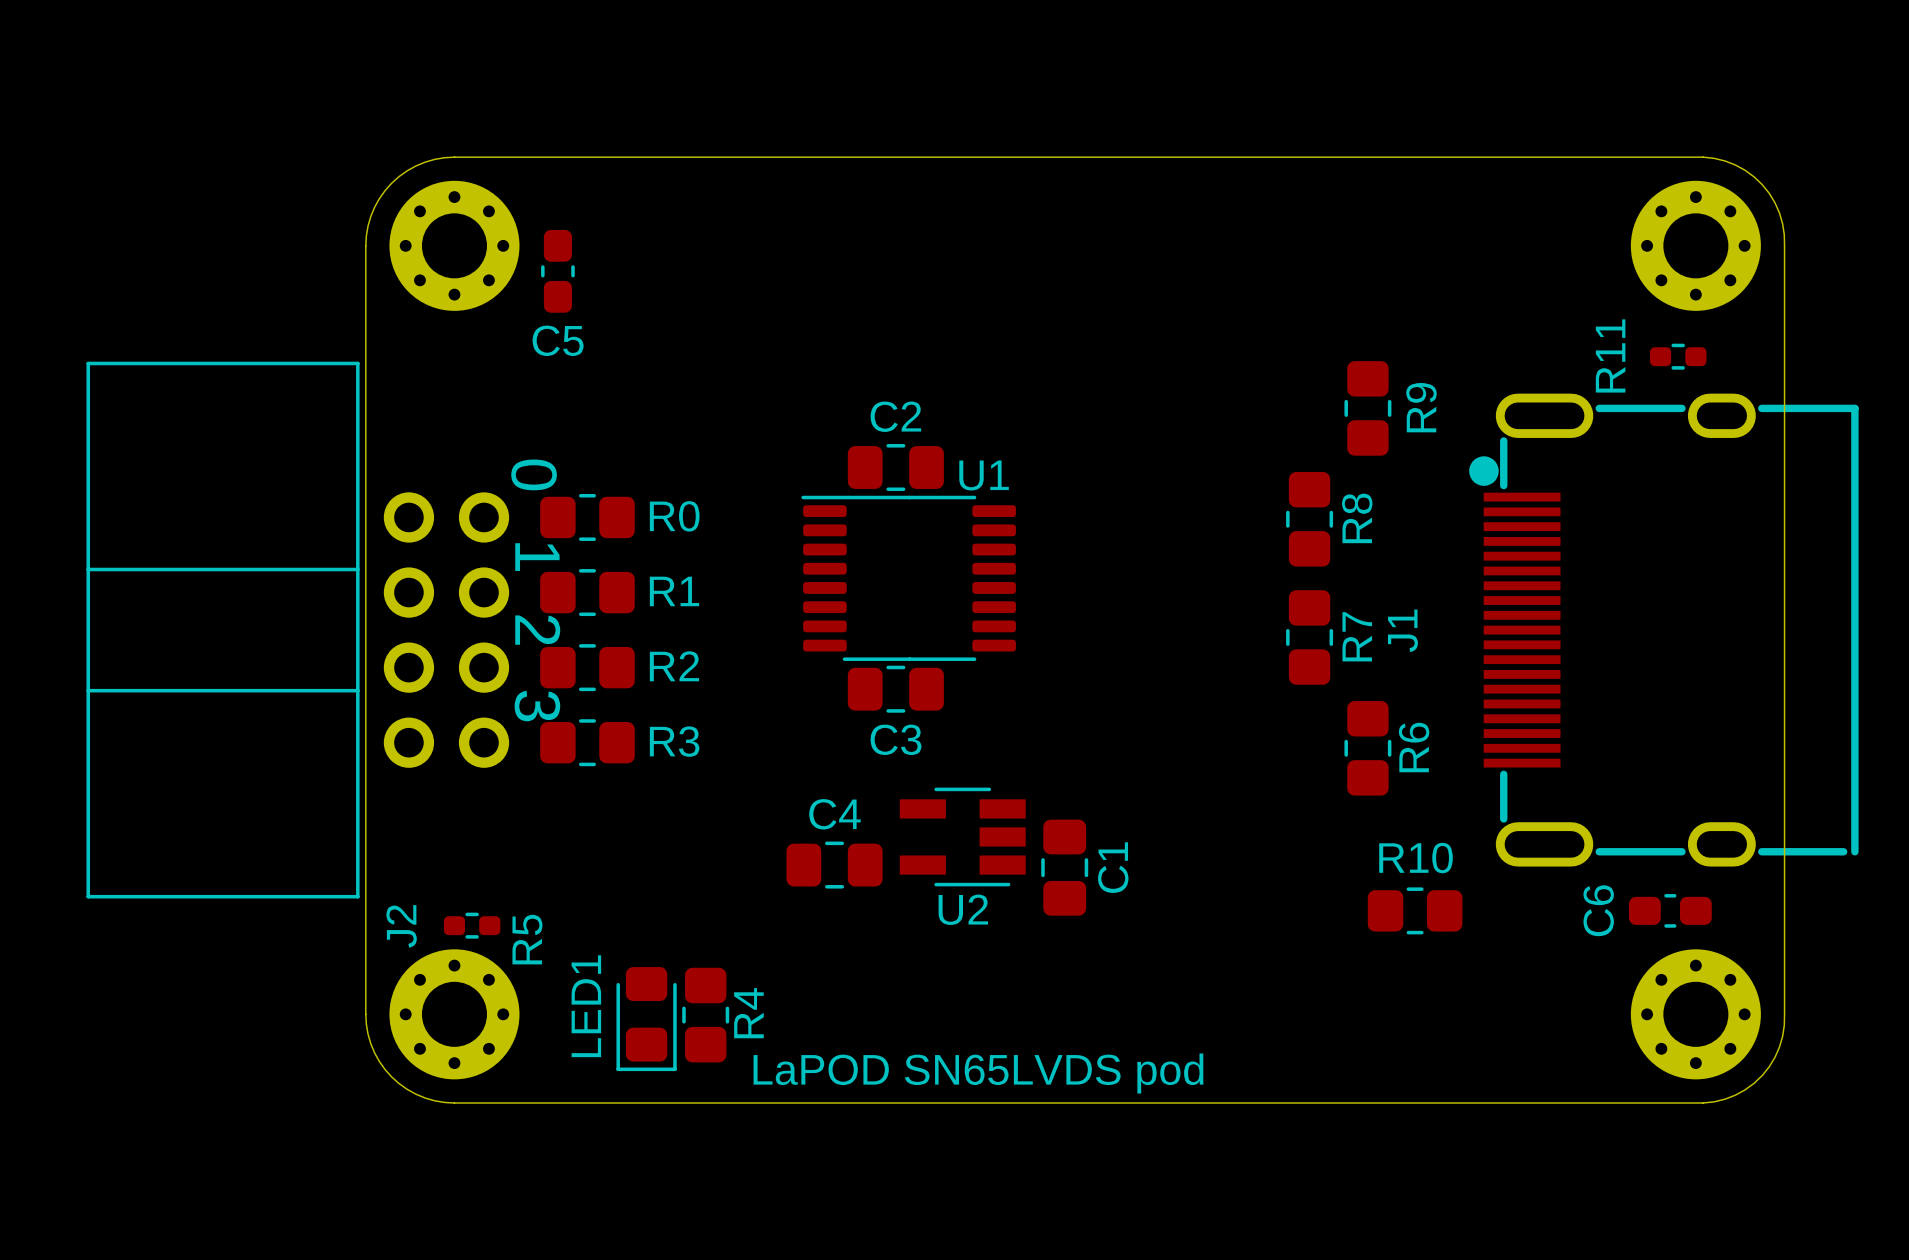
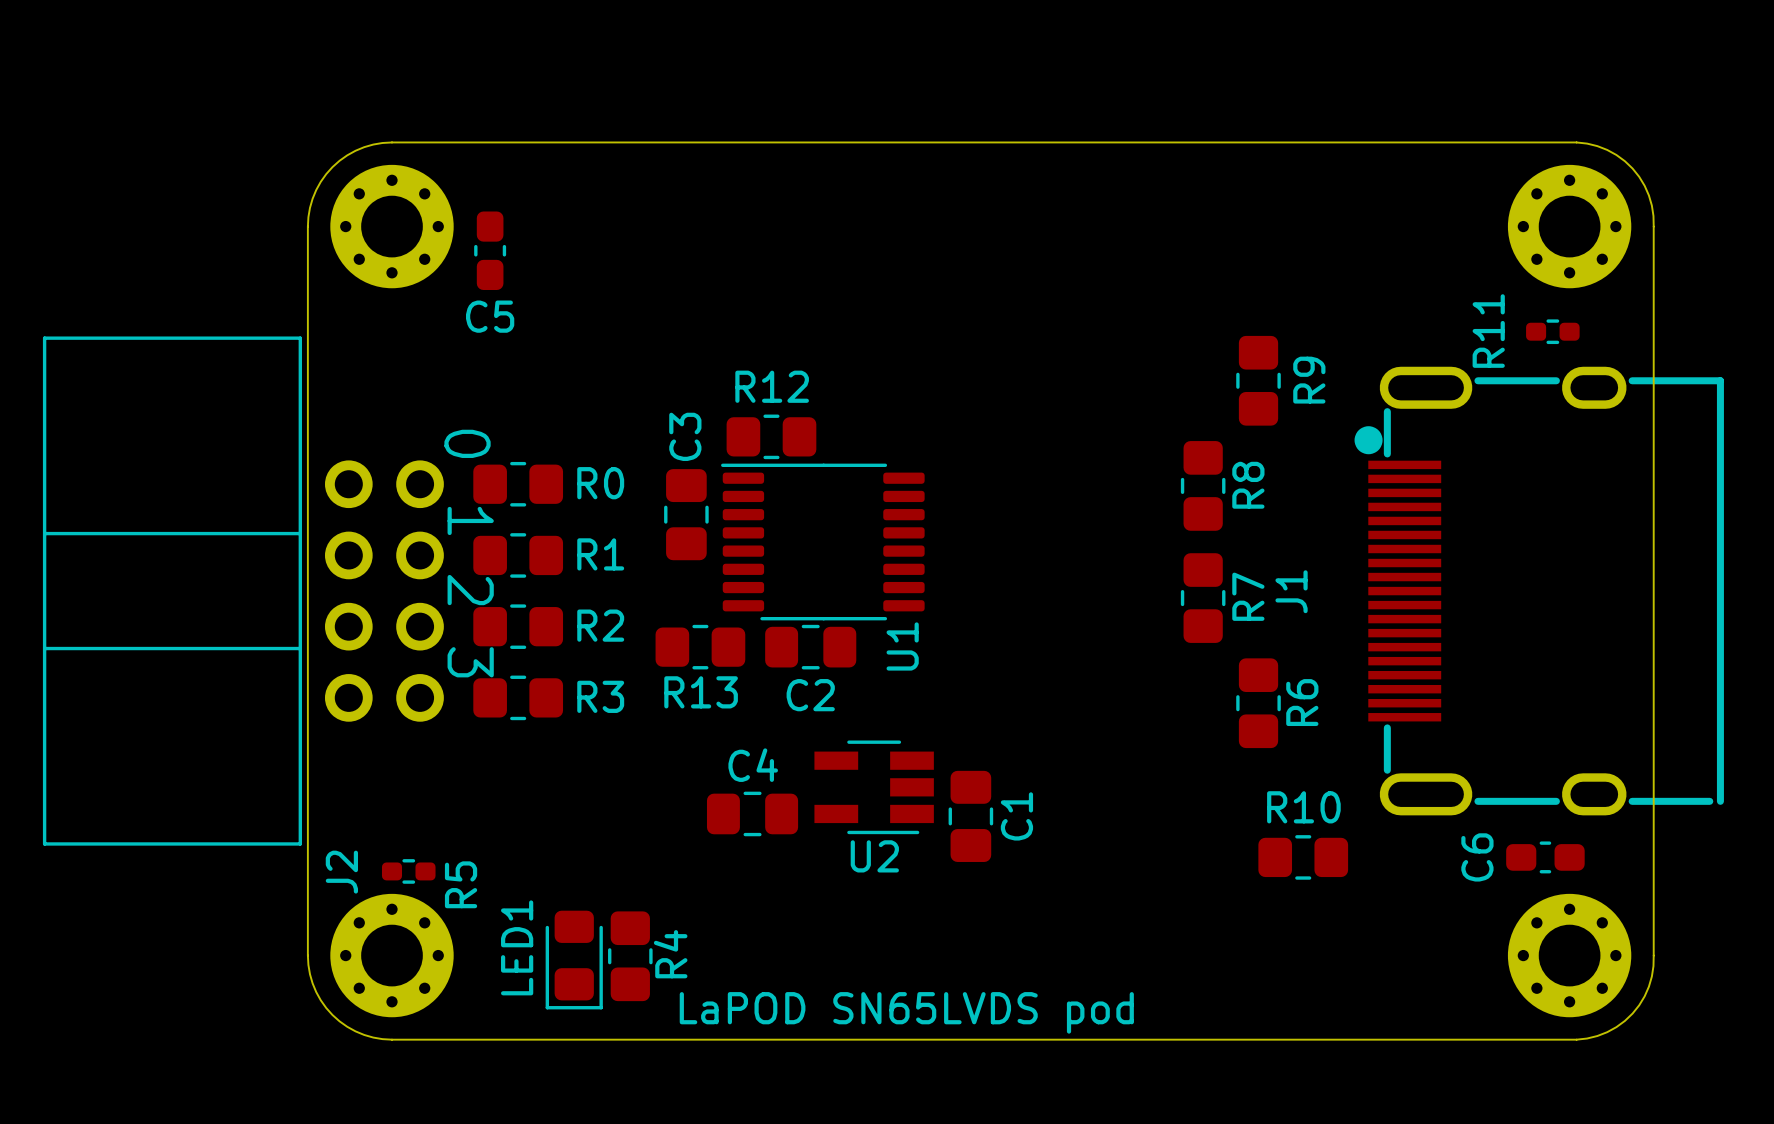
R12: none -> (771, 436)
C2: (895, 467) -> none
U1 name rotation: 0° (984, 475) -> 90° counterclockwise (902, 646)
U1 name position: U1 (984, 475) -> U1 (902, 646)
C3: none -> (686, 514)
R13: none -> (700, 647)
C3 name: C3 (896, 739) -> C2 (810, 695)

